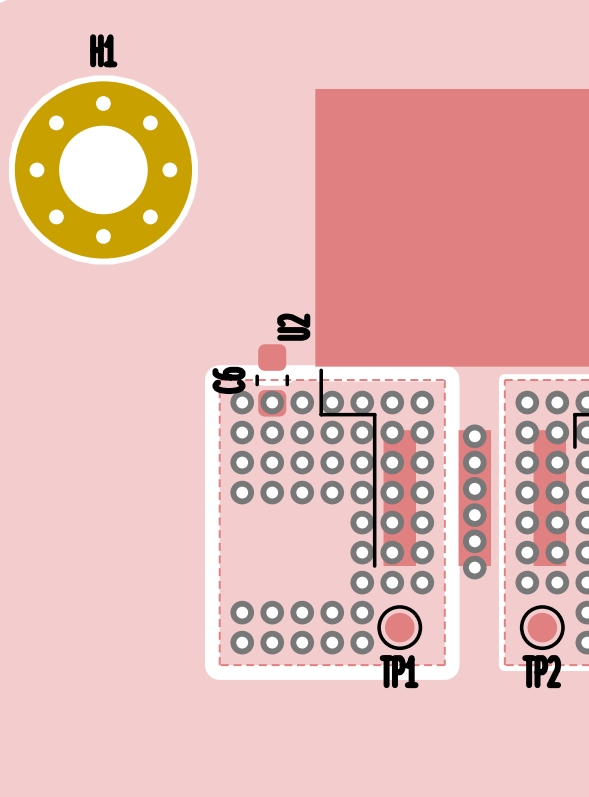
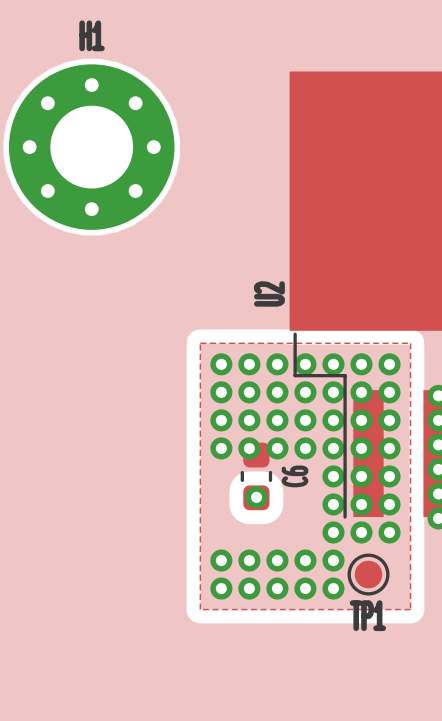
C6 name position: C6 (228, 380) -> C6 (295, 476)
C6 position: (272, 380) -> (256, 476)
via: none -> (256, 497)

